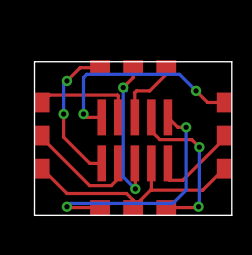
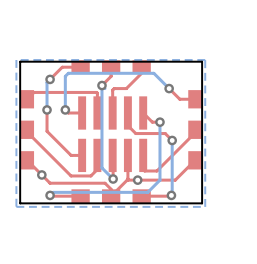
bottom zone outline: none -> (205, 60) (205, 206) (16, 206) (16, 60) (205, 60)
via: none -> (41, 174)
via: none -> (137, 180)

